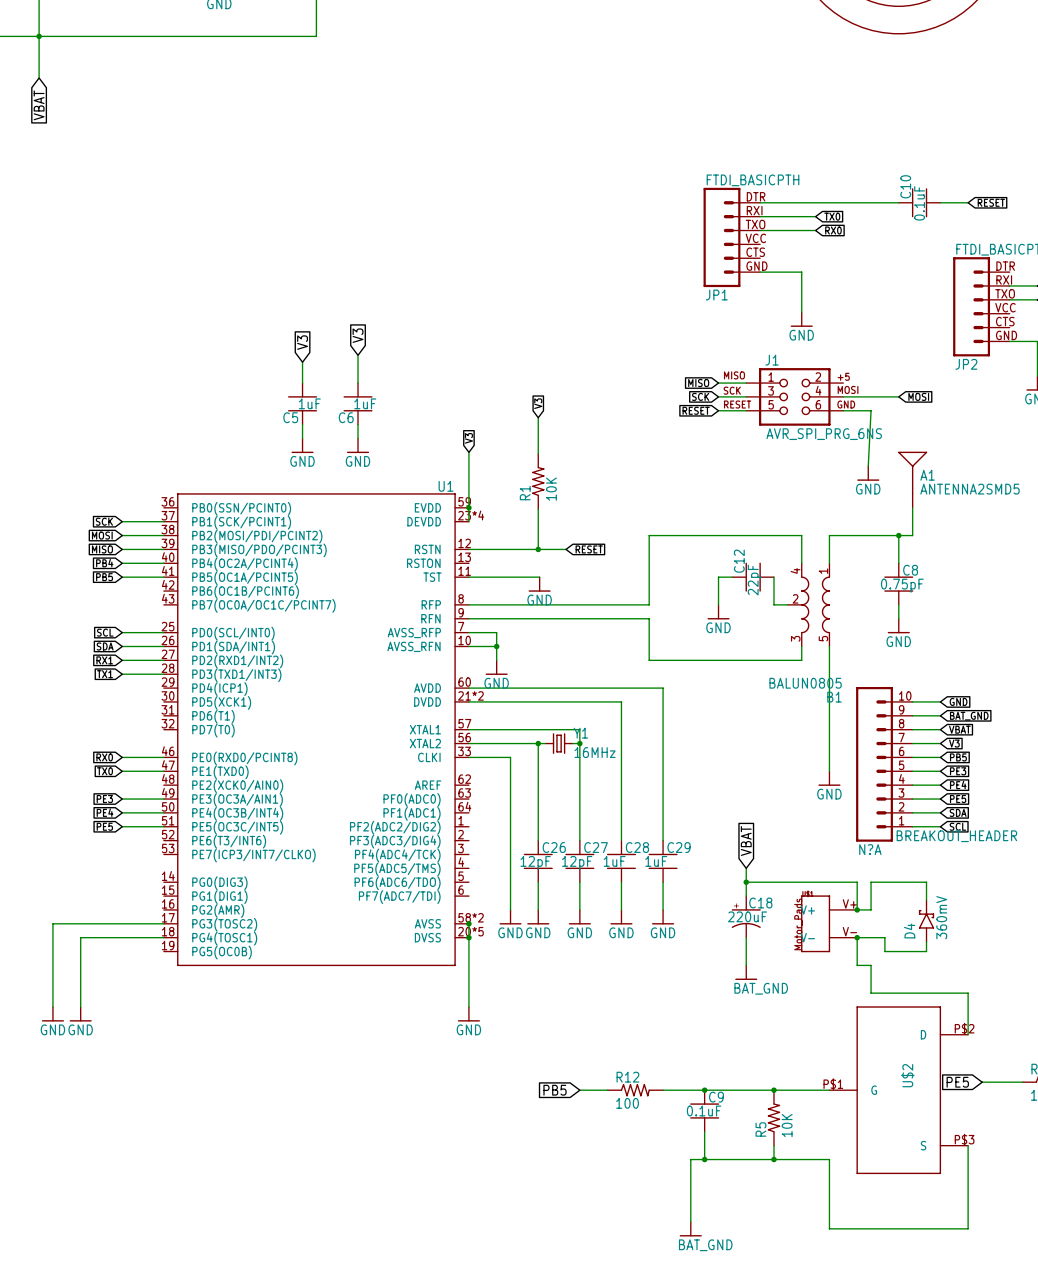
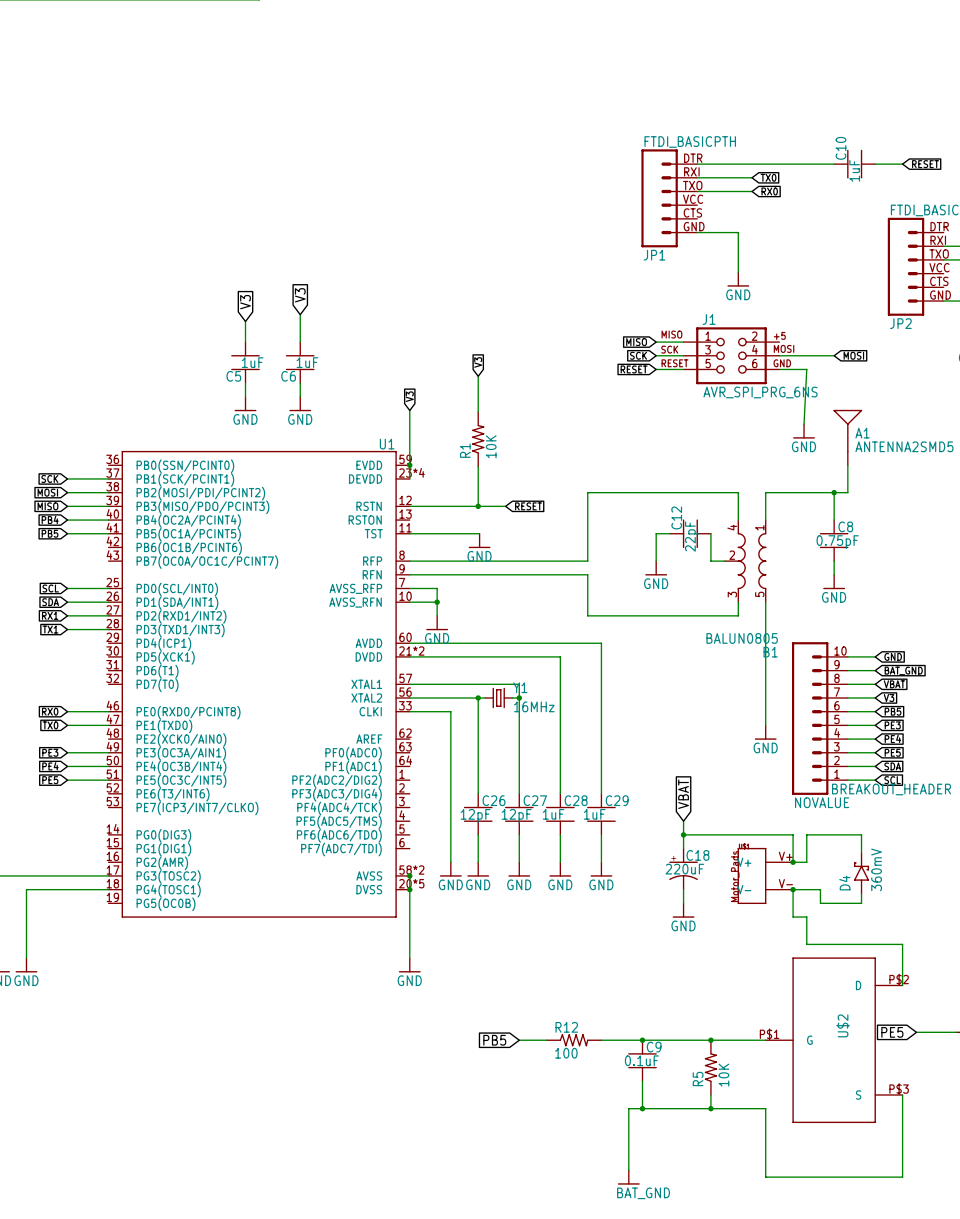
C10 value: 0.1uF (919, 203) -> 1uF (854, 170)
BREAKOUT_HEADER value: N?A (870, 849) -> NOVALUE (822, 802)
power symbol: none -> GND (683, 910)
power symbol: BAT_GND (746, 972) -> none

